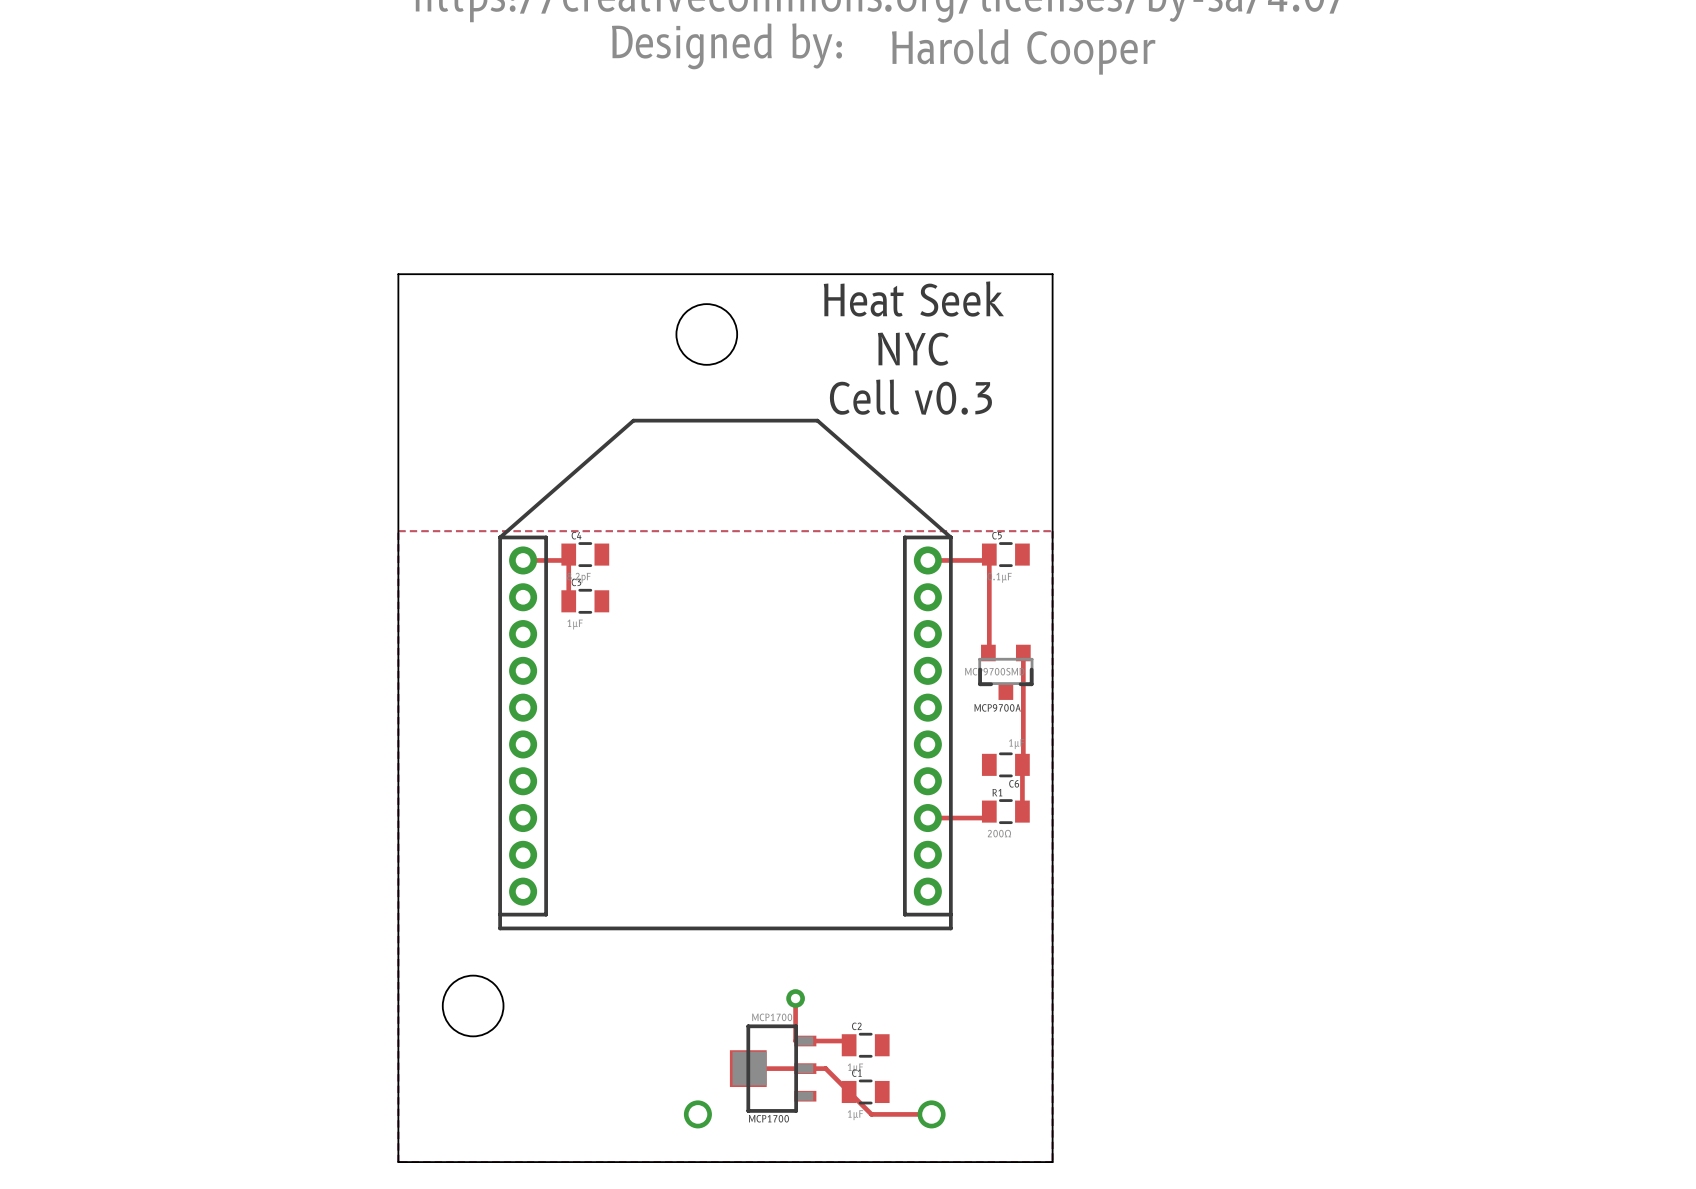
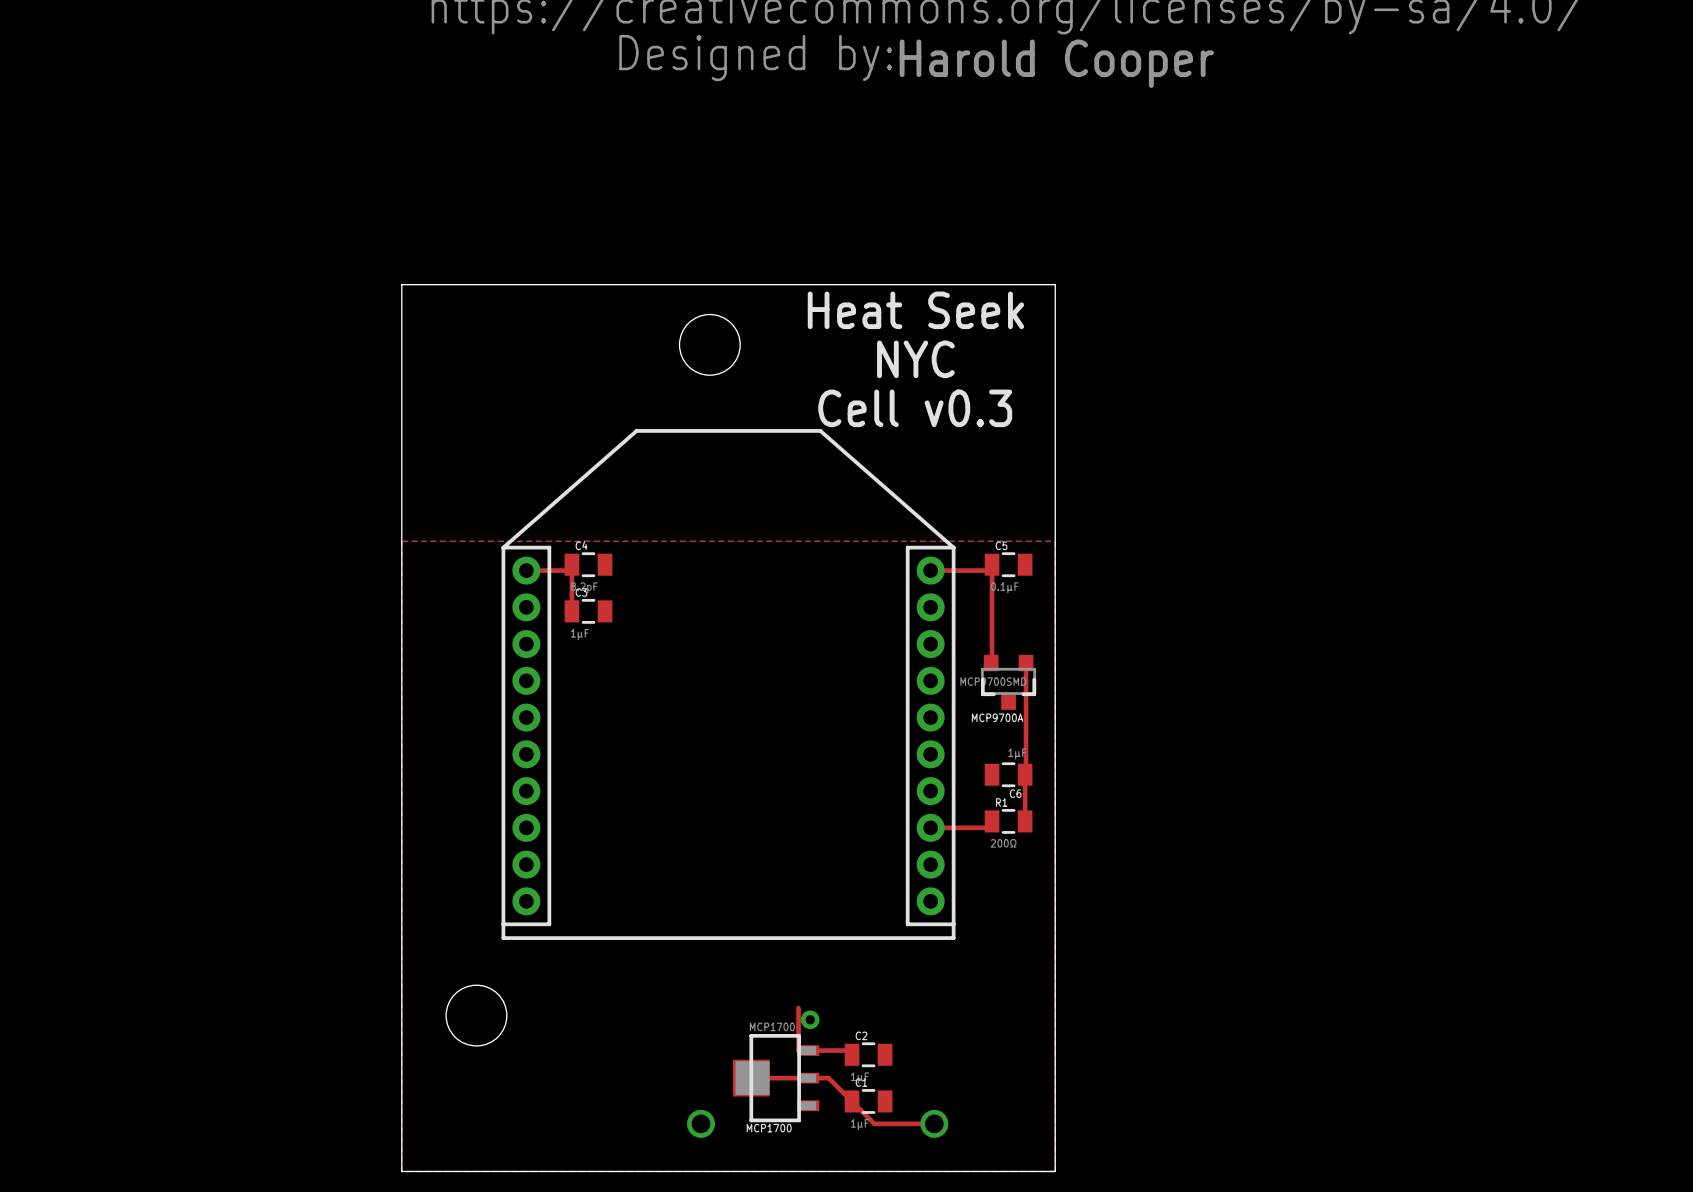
via position: (795, 998) -> (810, 1019)

